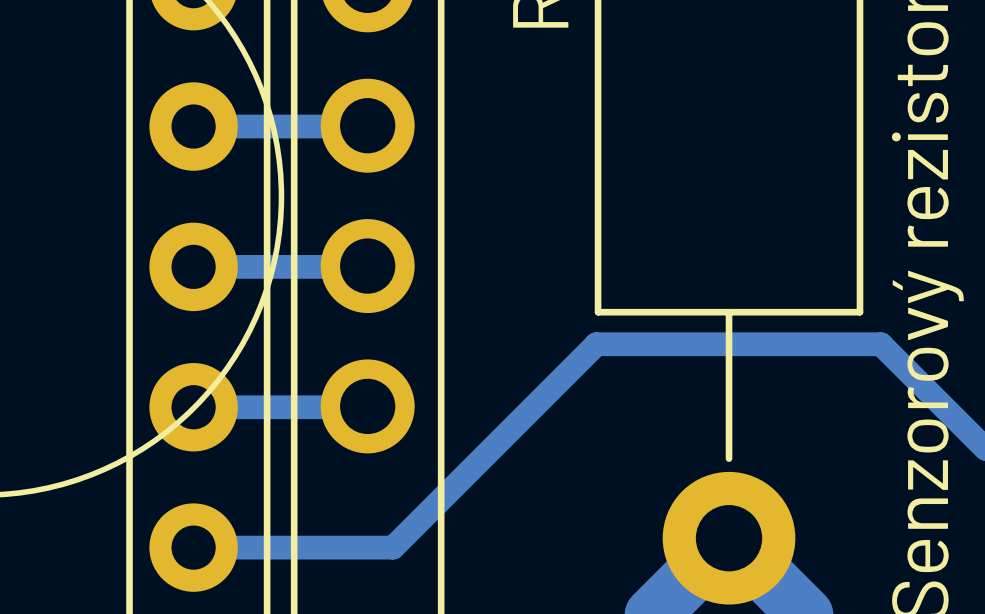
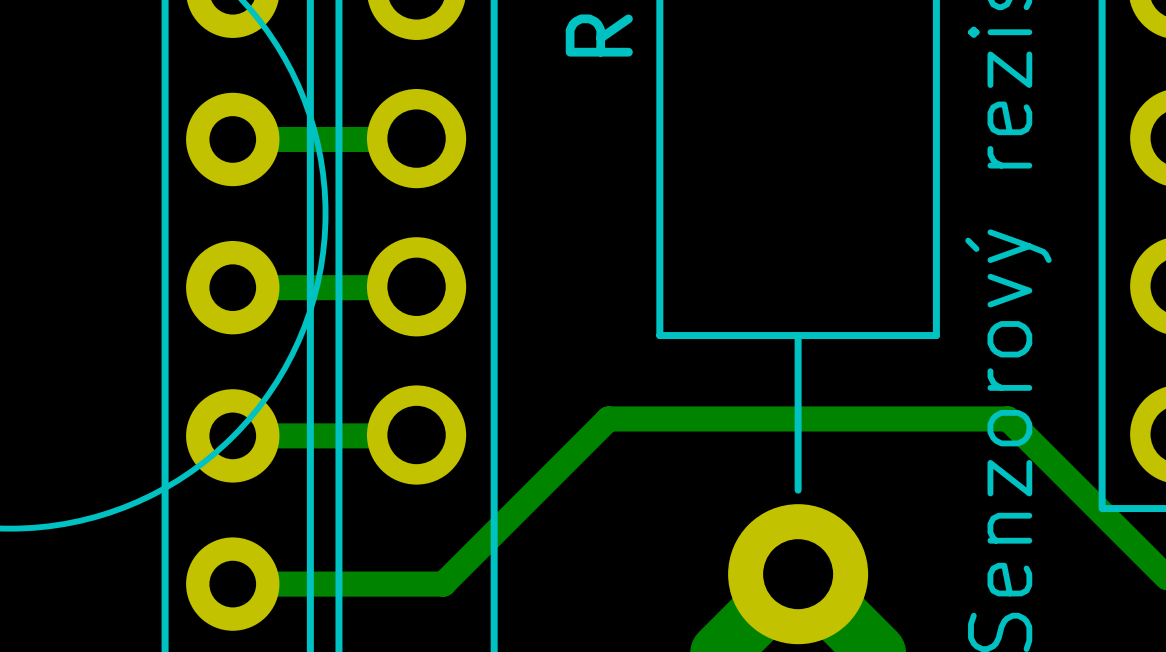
bottom track: (549, 391) (596, 344) (880, 344) (927, 391) -> (608, 418) (1008, 418)

